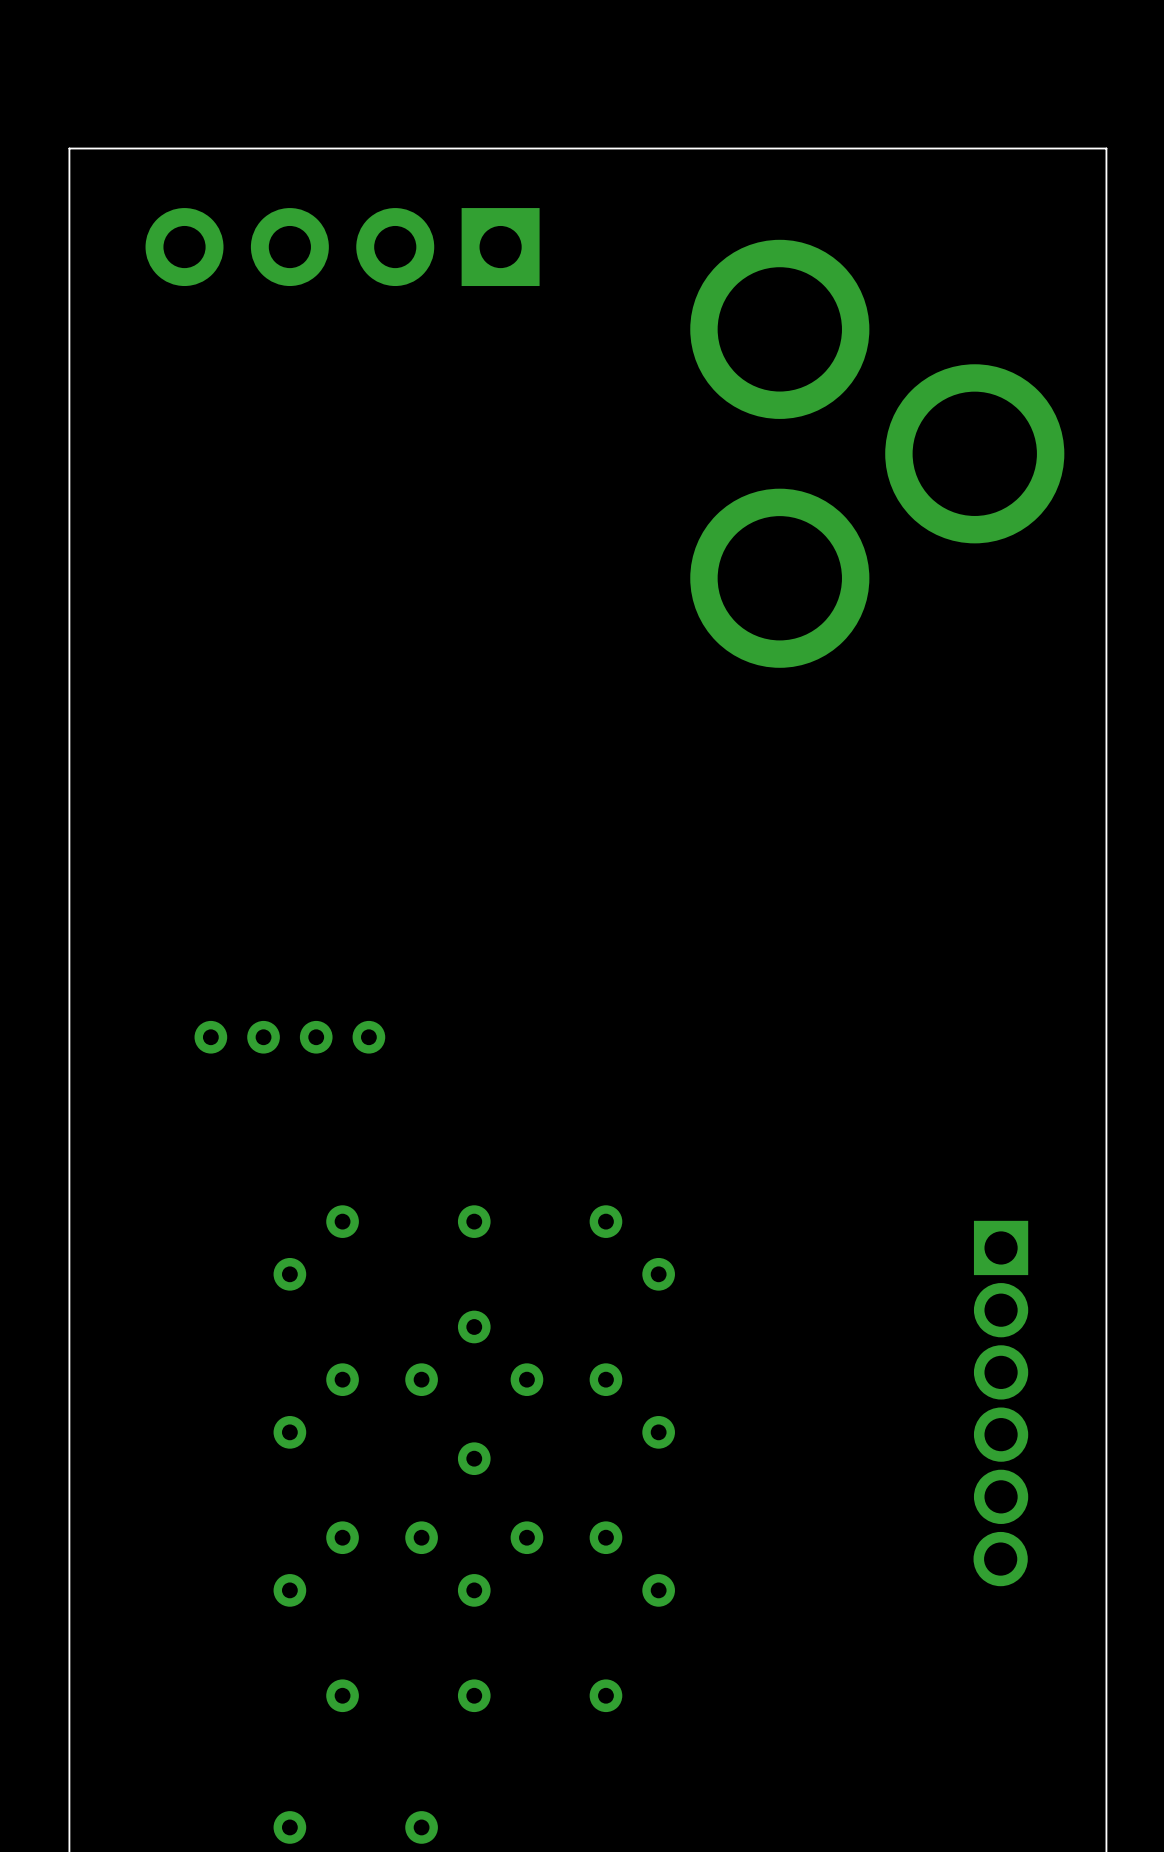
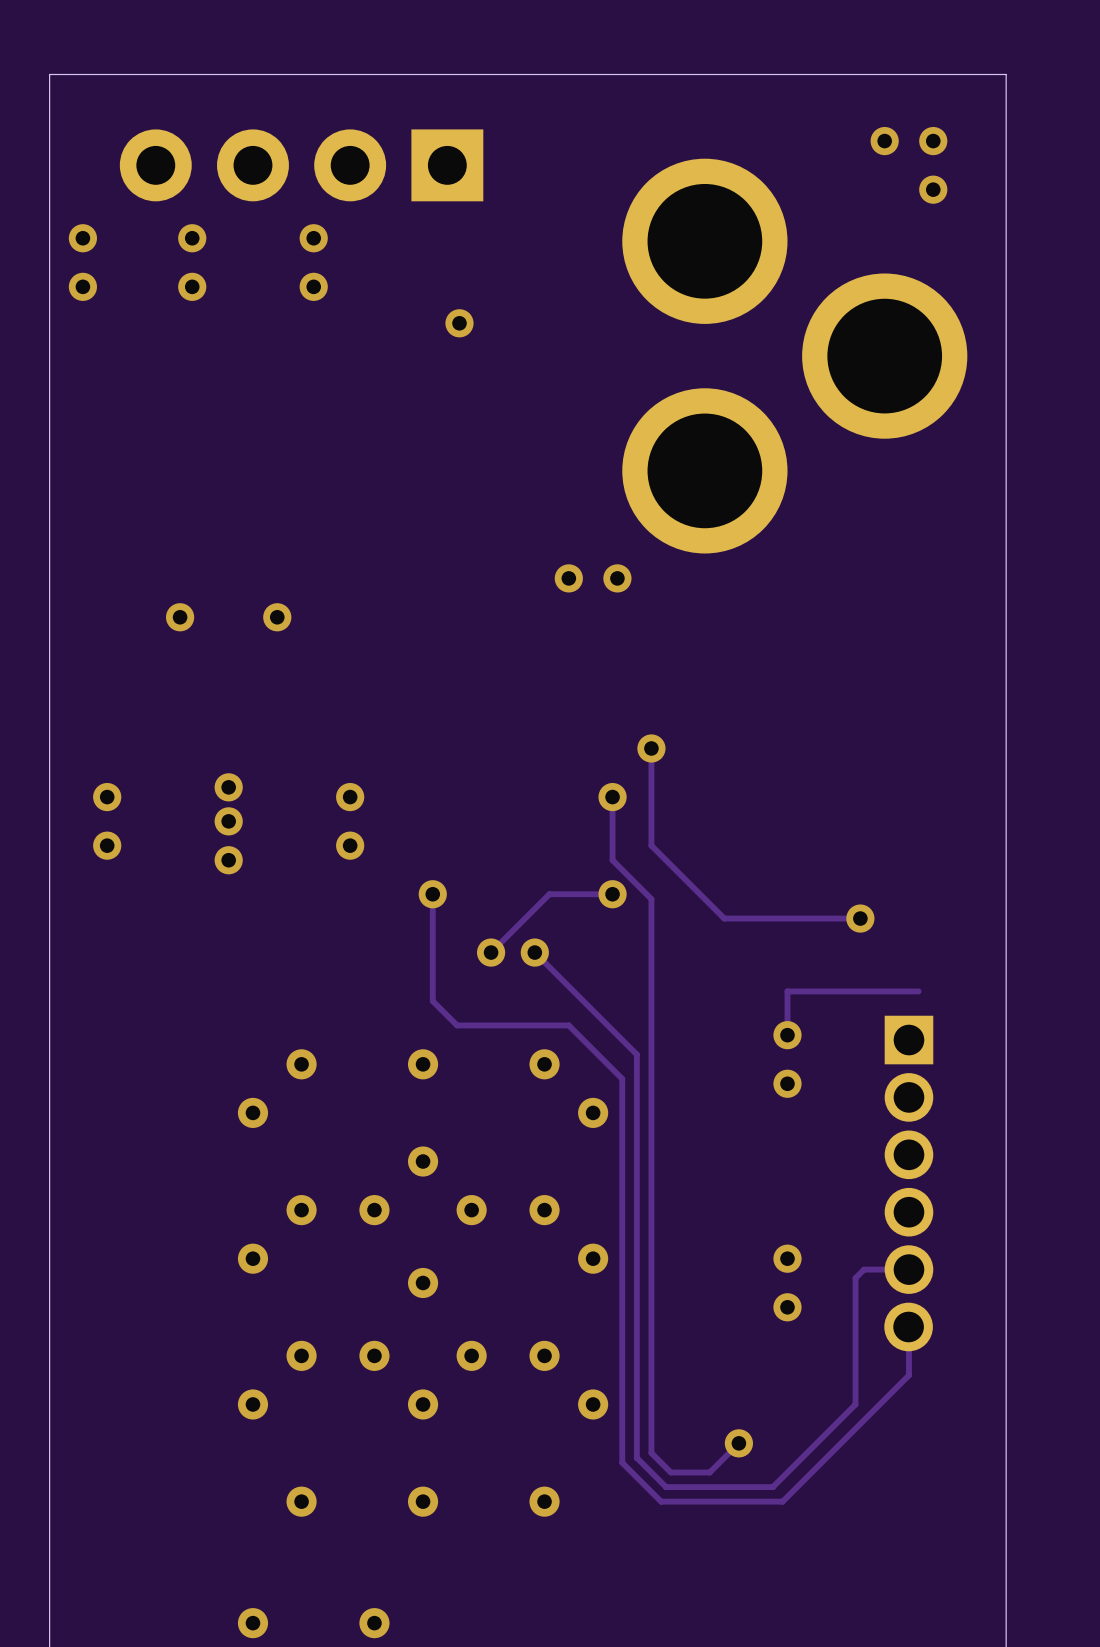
via: none -> (884, 141)
via: none -> (933, 141)
via: none -> (933, 189)
via: none -> (82, 238)
via: none -> (192, 238)
via: none -> (313, 238)
via: none -> (82, 286)
via: none -> (192, 286)
via: none -> (313, 286)
via: none -> (459, 323)
via: none -> (568, 578)
via: none -> (617, 578)
via: none -> (180, 617)
via: none -> (277, 617)
track: none -> (651, 748) (651, 845) (724, 918) (860, 918)
via: none -> (651, 748)
via: none -> (228, 787)
via: none -> (107, 797)
via: none -> (350, 797)
track: none -> (612, 797) (612, 860) (651, 899) (651, 1453) (670, 1472) (709, 1472) (738, 1443)
via: none -> (612, 797)
via: none -> (228, 821)
via: none -> (107, 845)
via: none -> (350, 845)
via: none -> (228, 860)
via: (210, 1037) -> none
via: (263, 1037) -> none
via: (316, 1037) -> none
via: (368, 1037) -> none
track: none -> (432, 894) (432, 1001) (457, 1025) (568, 1025) (622, 1078) (622, 1462) (661, 1501) (782, 1501) (908, 1375) (908, 1327)
via: none -> (432, 894)
track: none -> (612, 894) (549, 894) (491, 952)
via: none -> (612, 894)
via: none -> (860, 918)
via: none -> (491, 952)
track: none -> (534, 952) (636, 1054) (636, 1457) (666, 1487) (772, 1487) (855, 1404) (855, 1278) (864, 1269) (908, 1269)
via: none -> (534, 952)
track: none -> (918, 991) (787, 991) (787, 1035)
via: none -> (787, 1035)
via: none -> (787, 1083)
part: none -> (908, 1183)
part: (1000, 1403) -> none
via: none -> (787, 1258)
via: none -> (787, 1307)
via: none -> (738, 1443)

